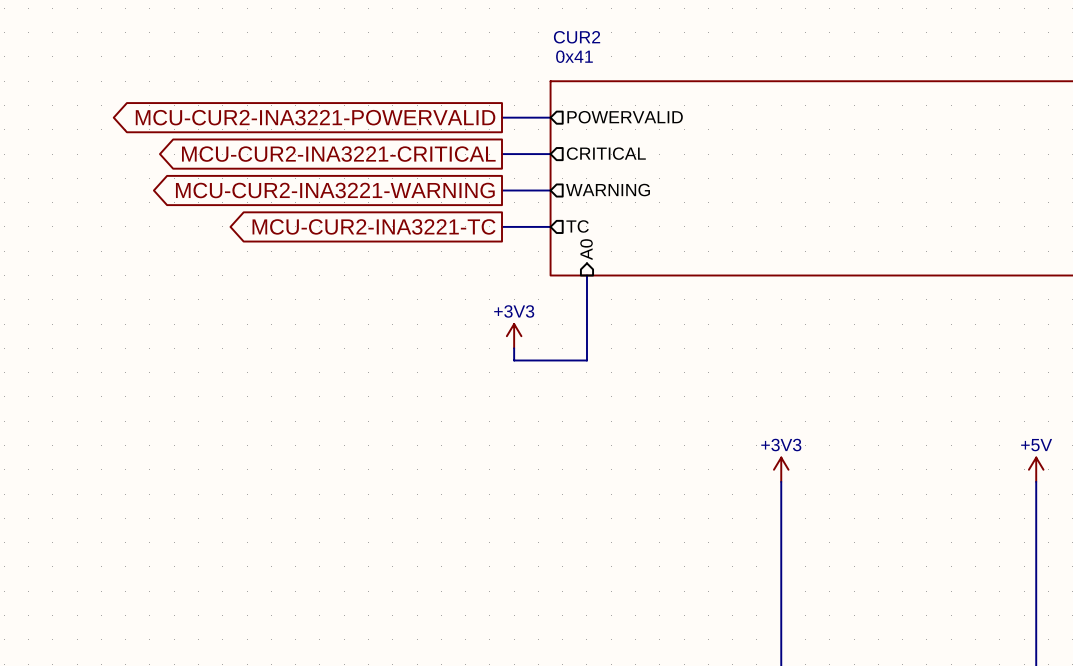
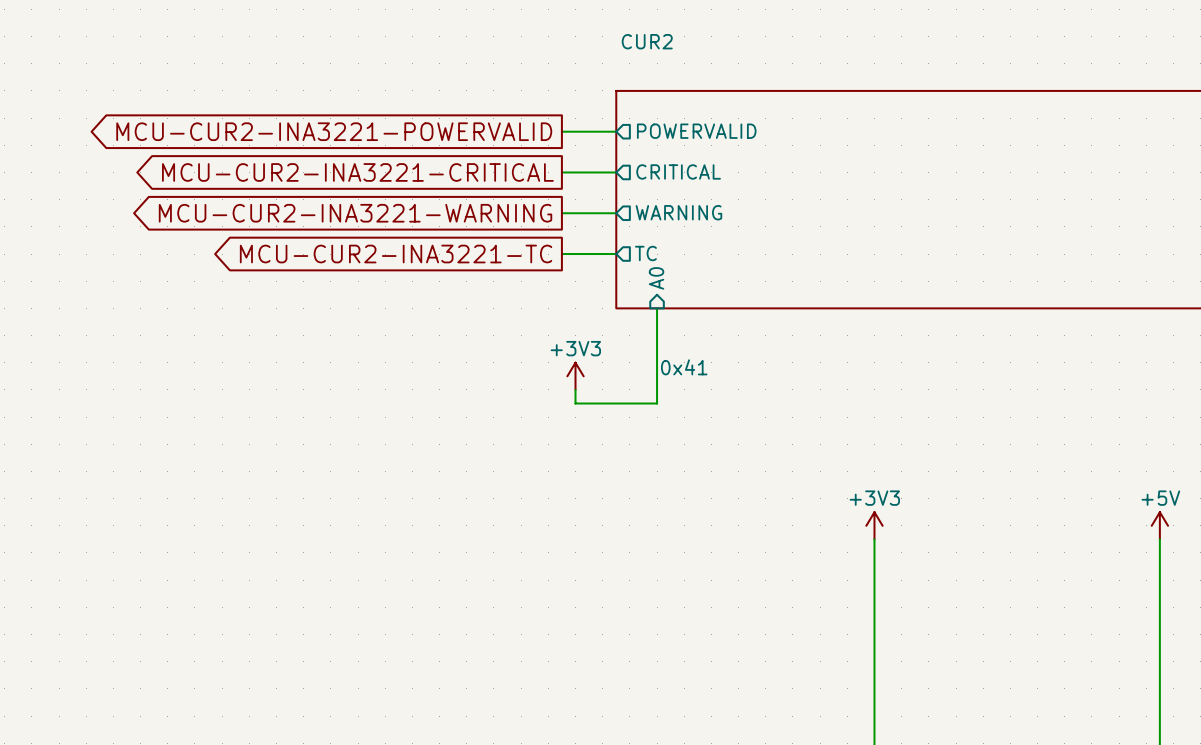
text: 0x41 (574, 56) -> none
sheet CUR2 text: none -> 0x41 (684, 367)

